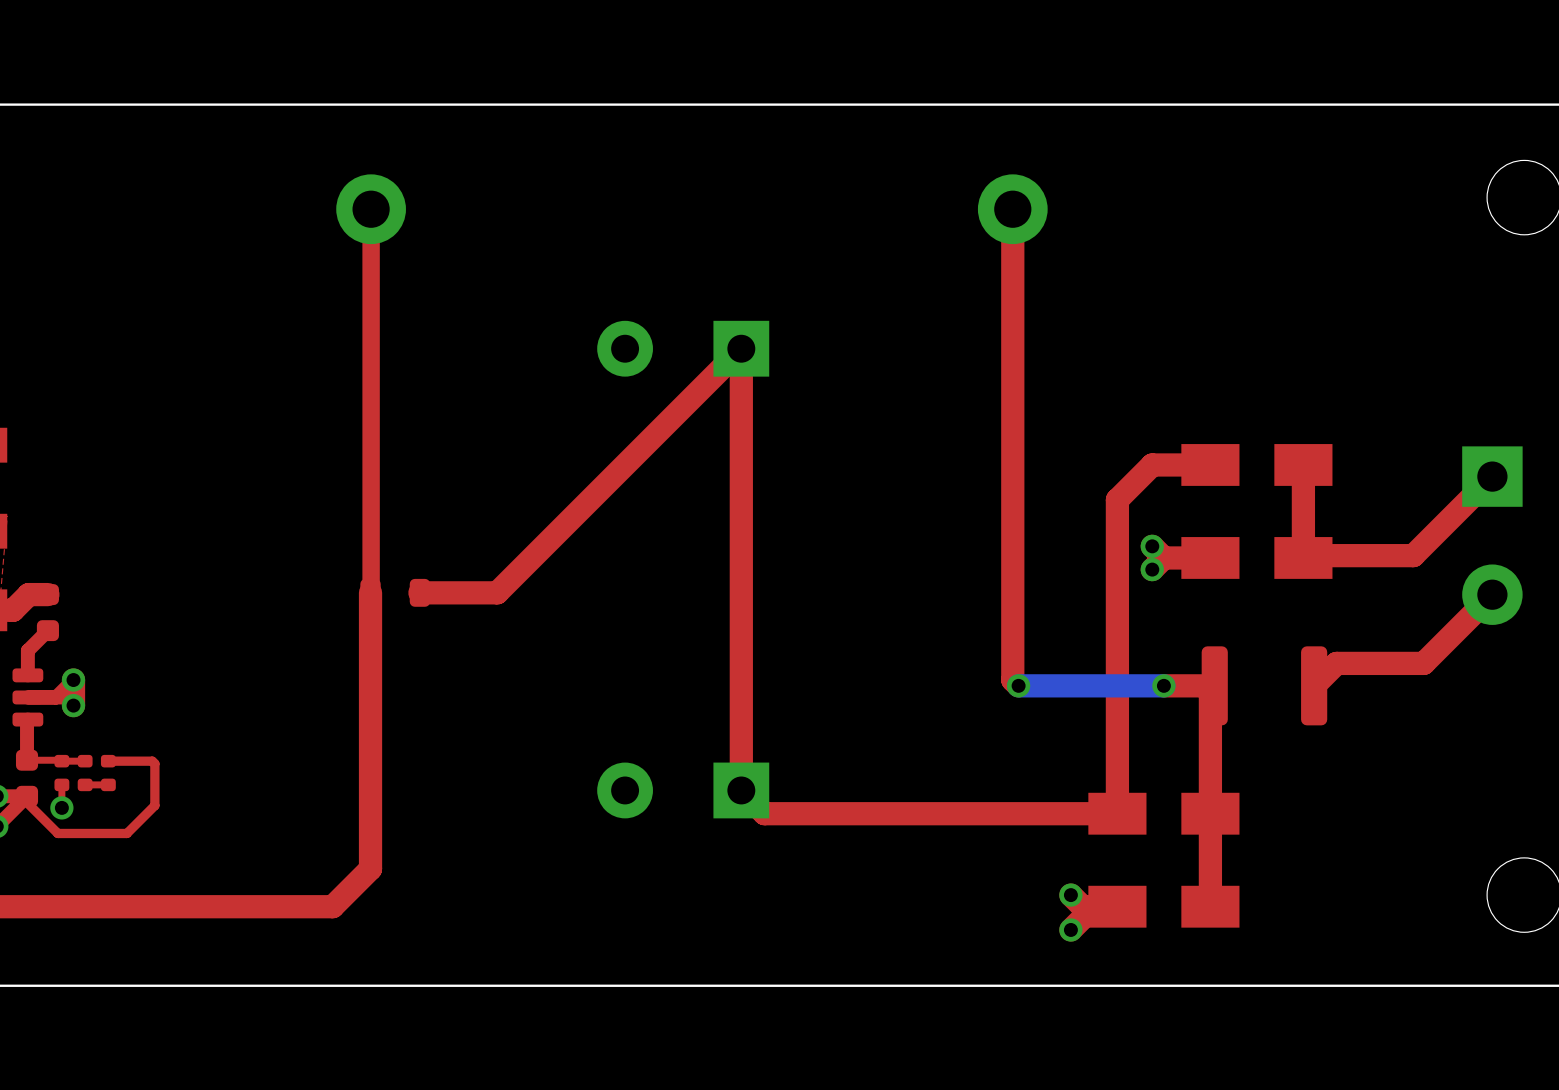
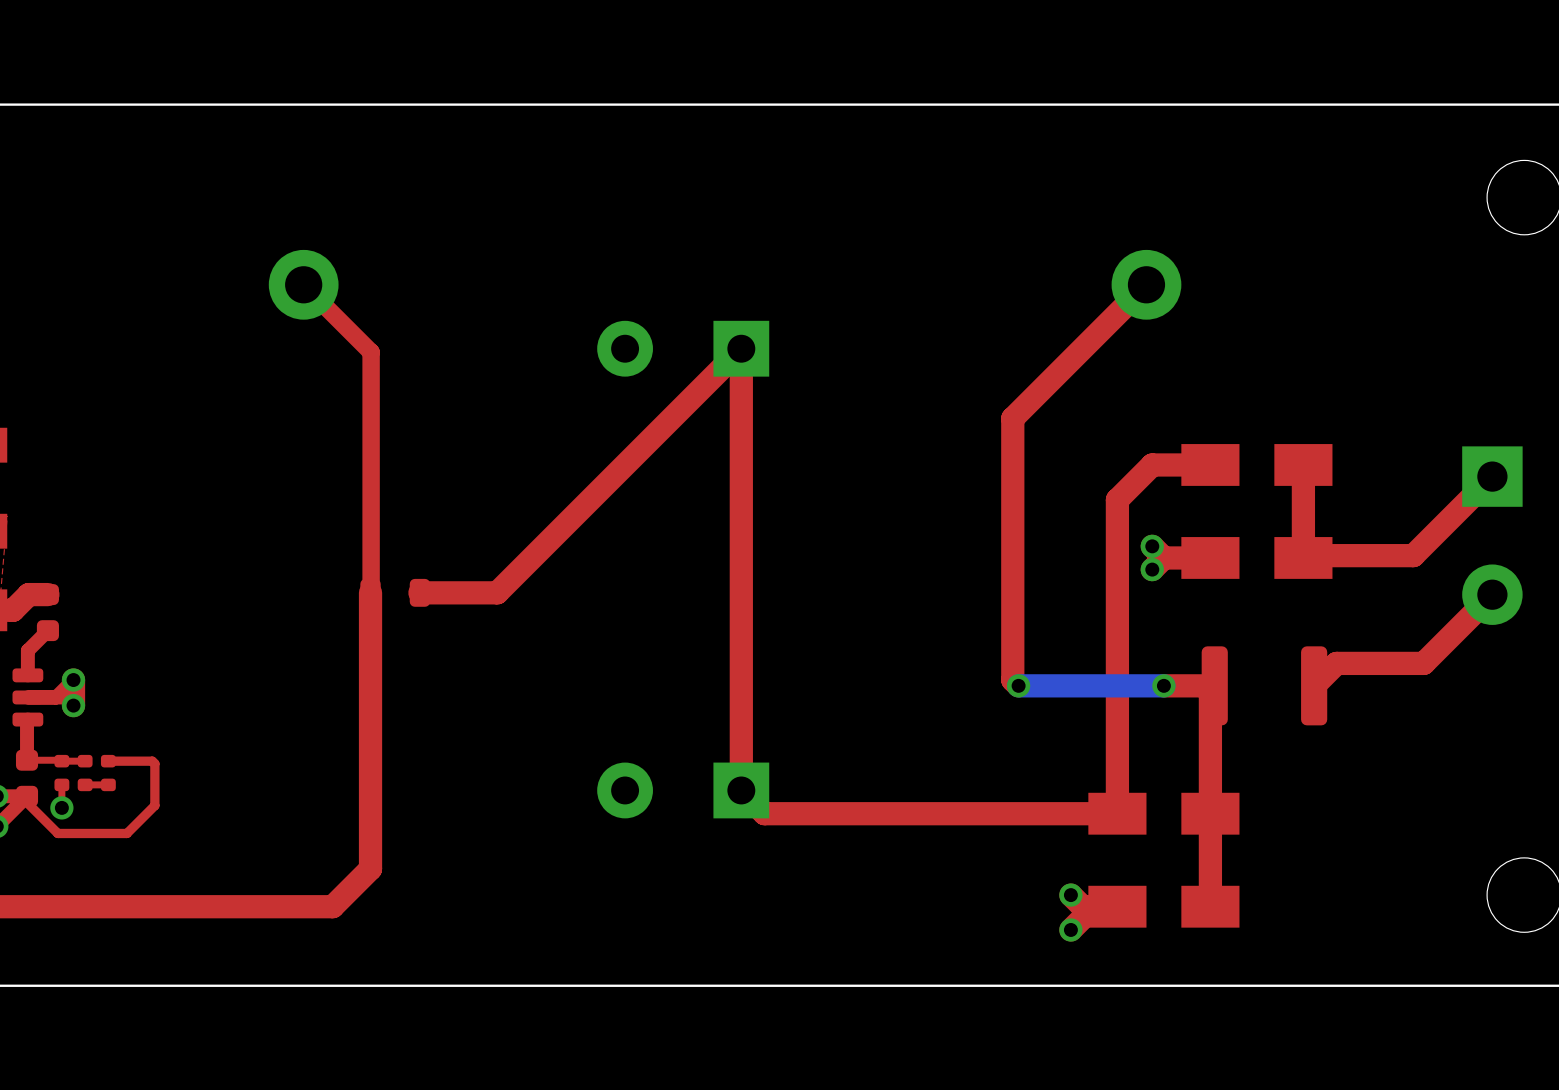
top track: (371, 209) (371, 352) -> (303, 284) (371, 352)
part position: (371, 209) -> (303, 284)
top track: (1012, 209) (1012, 418) -> (1146, 284) (1012, 418)
part position: (1012, 209) -> (1146, 284)

